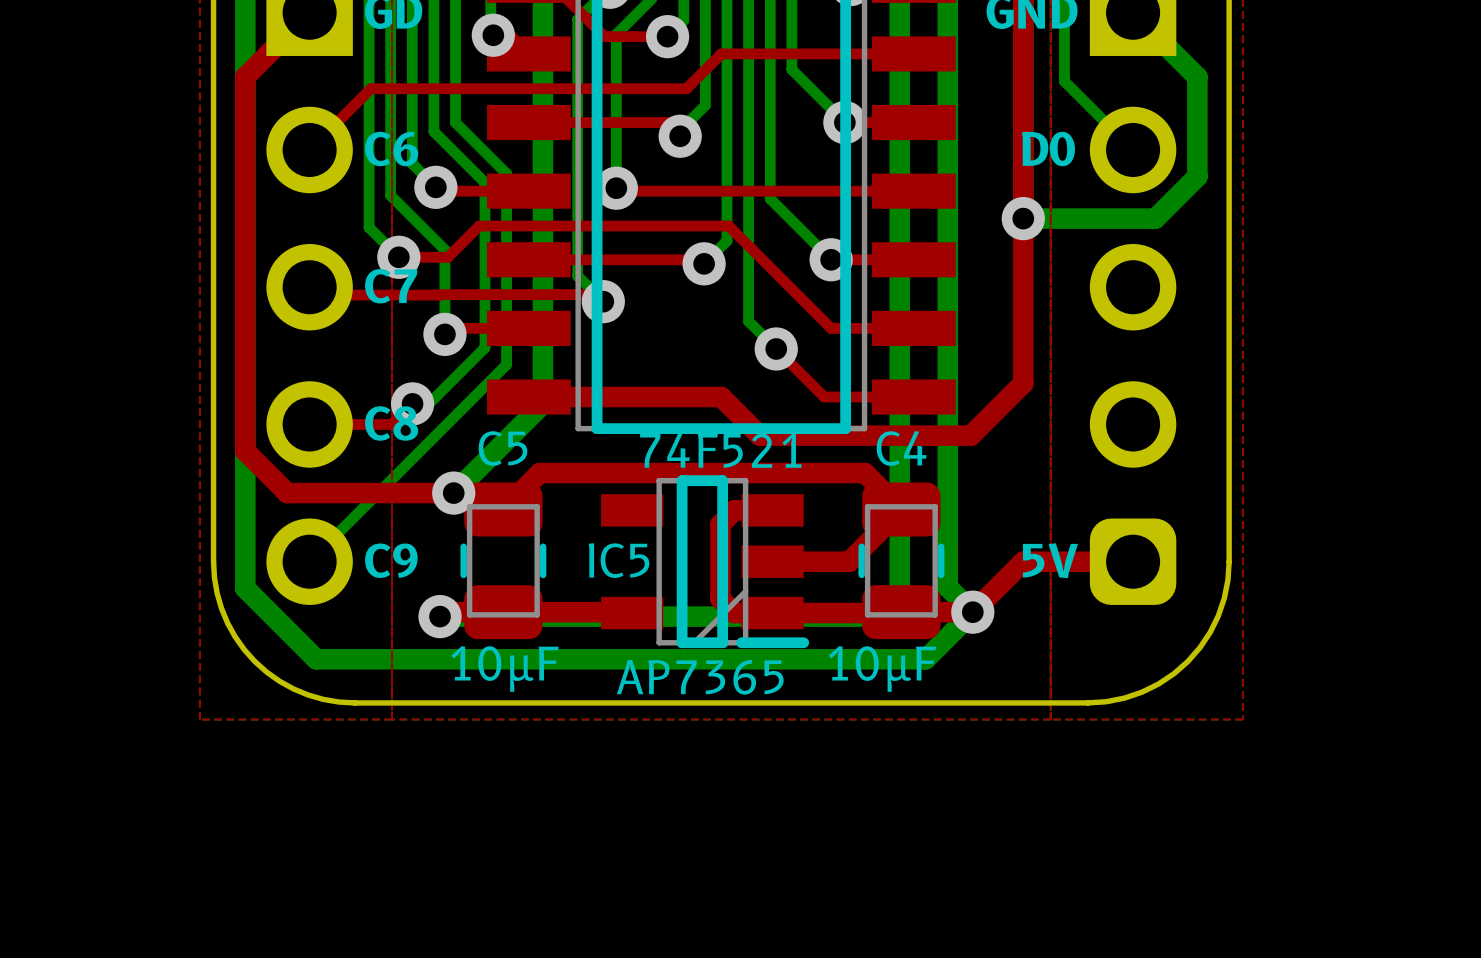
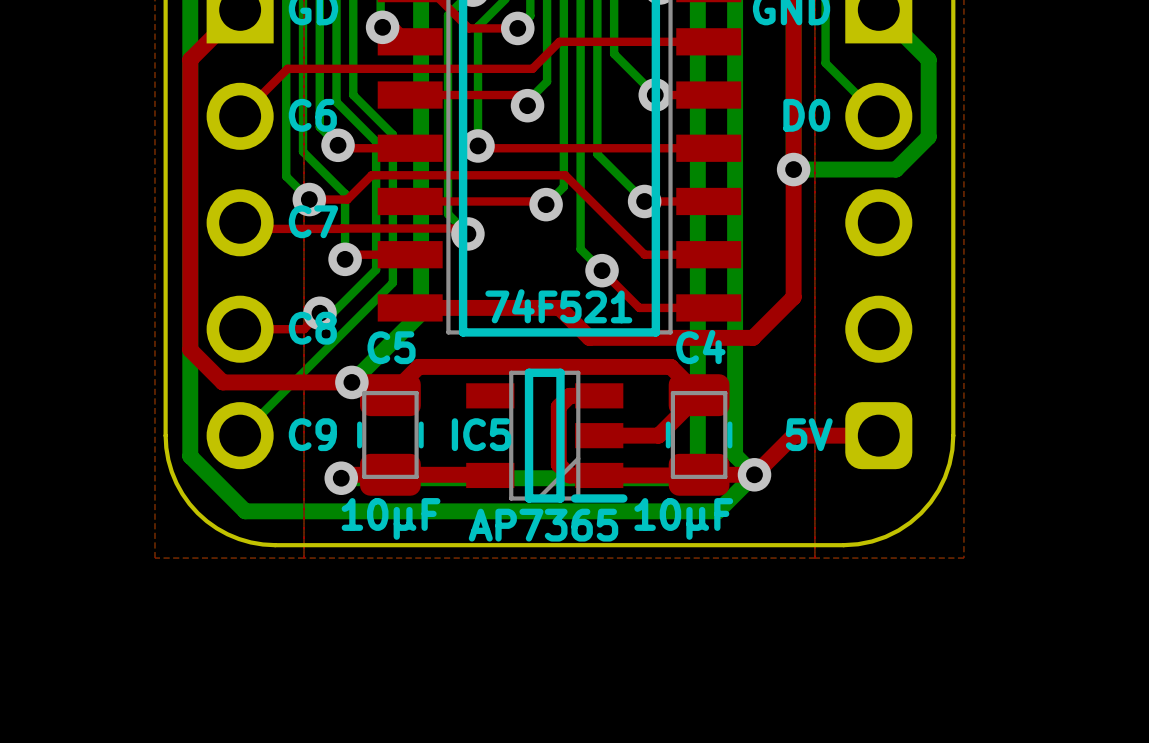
part text position: 74F521 (720, 450) -> 74F521 (558, 306)

